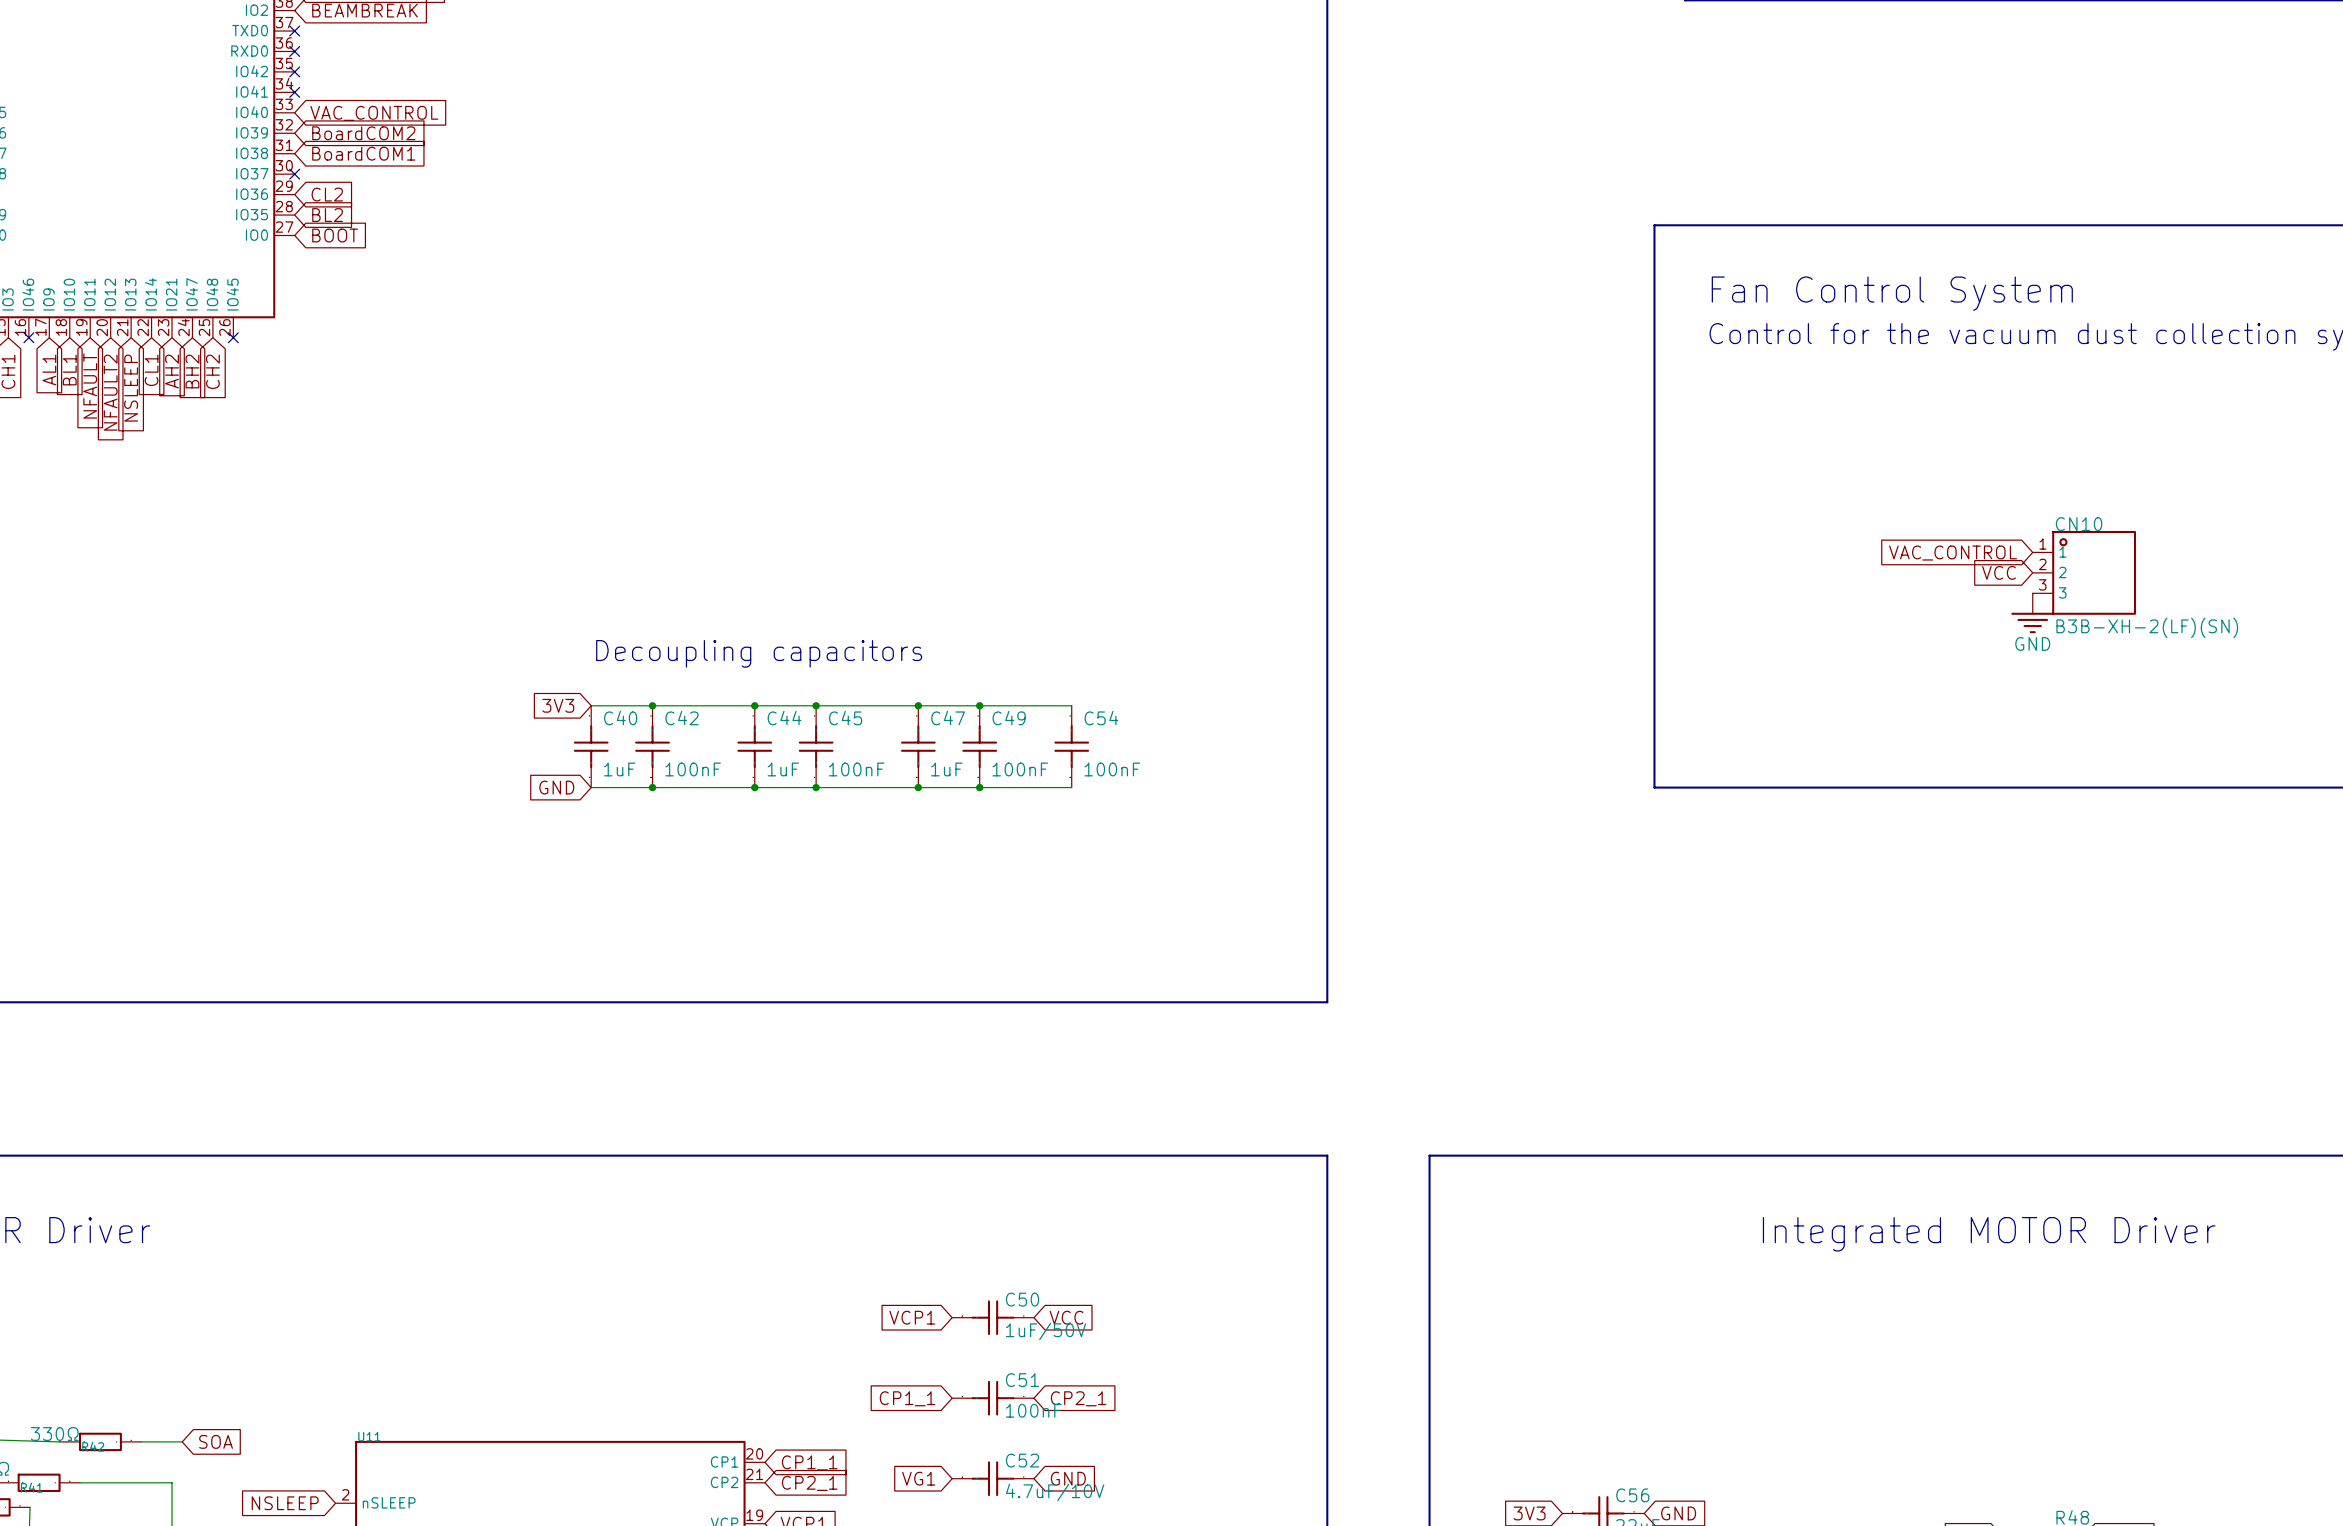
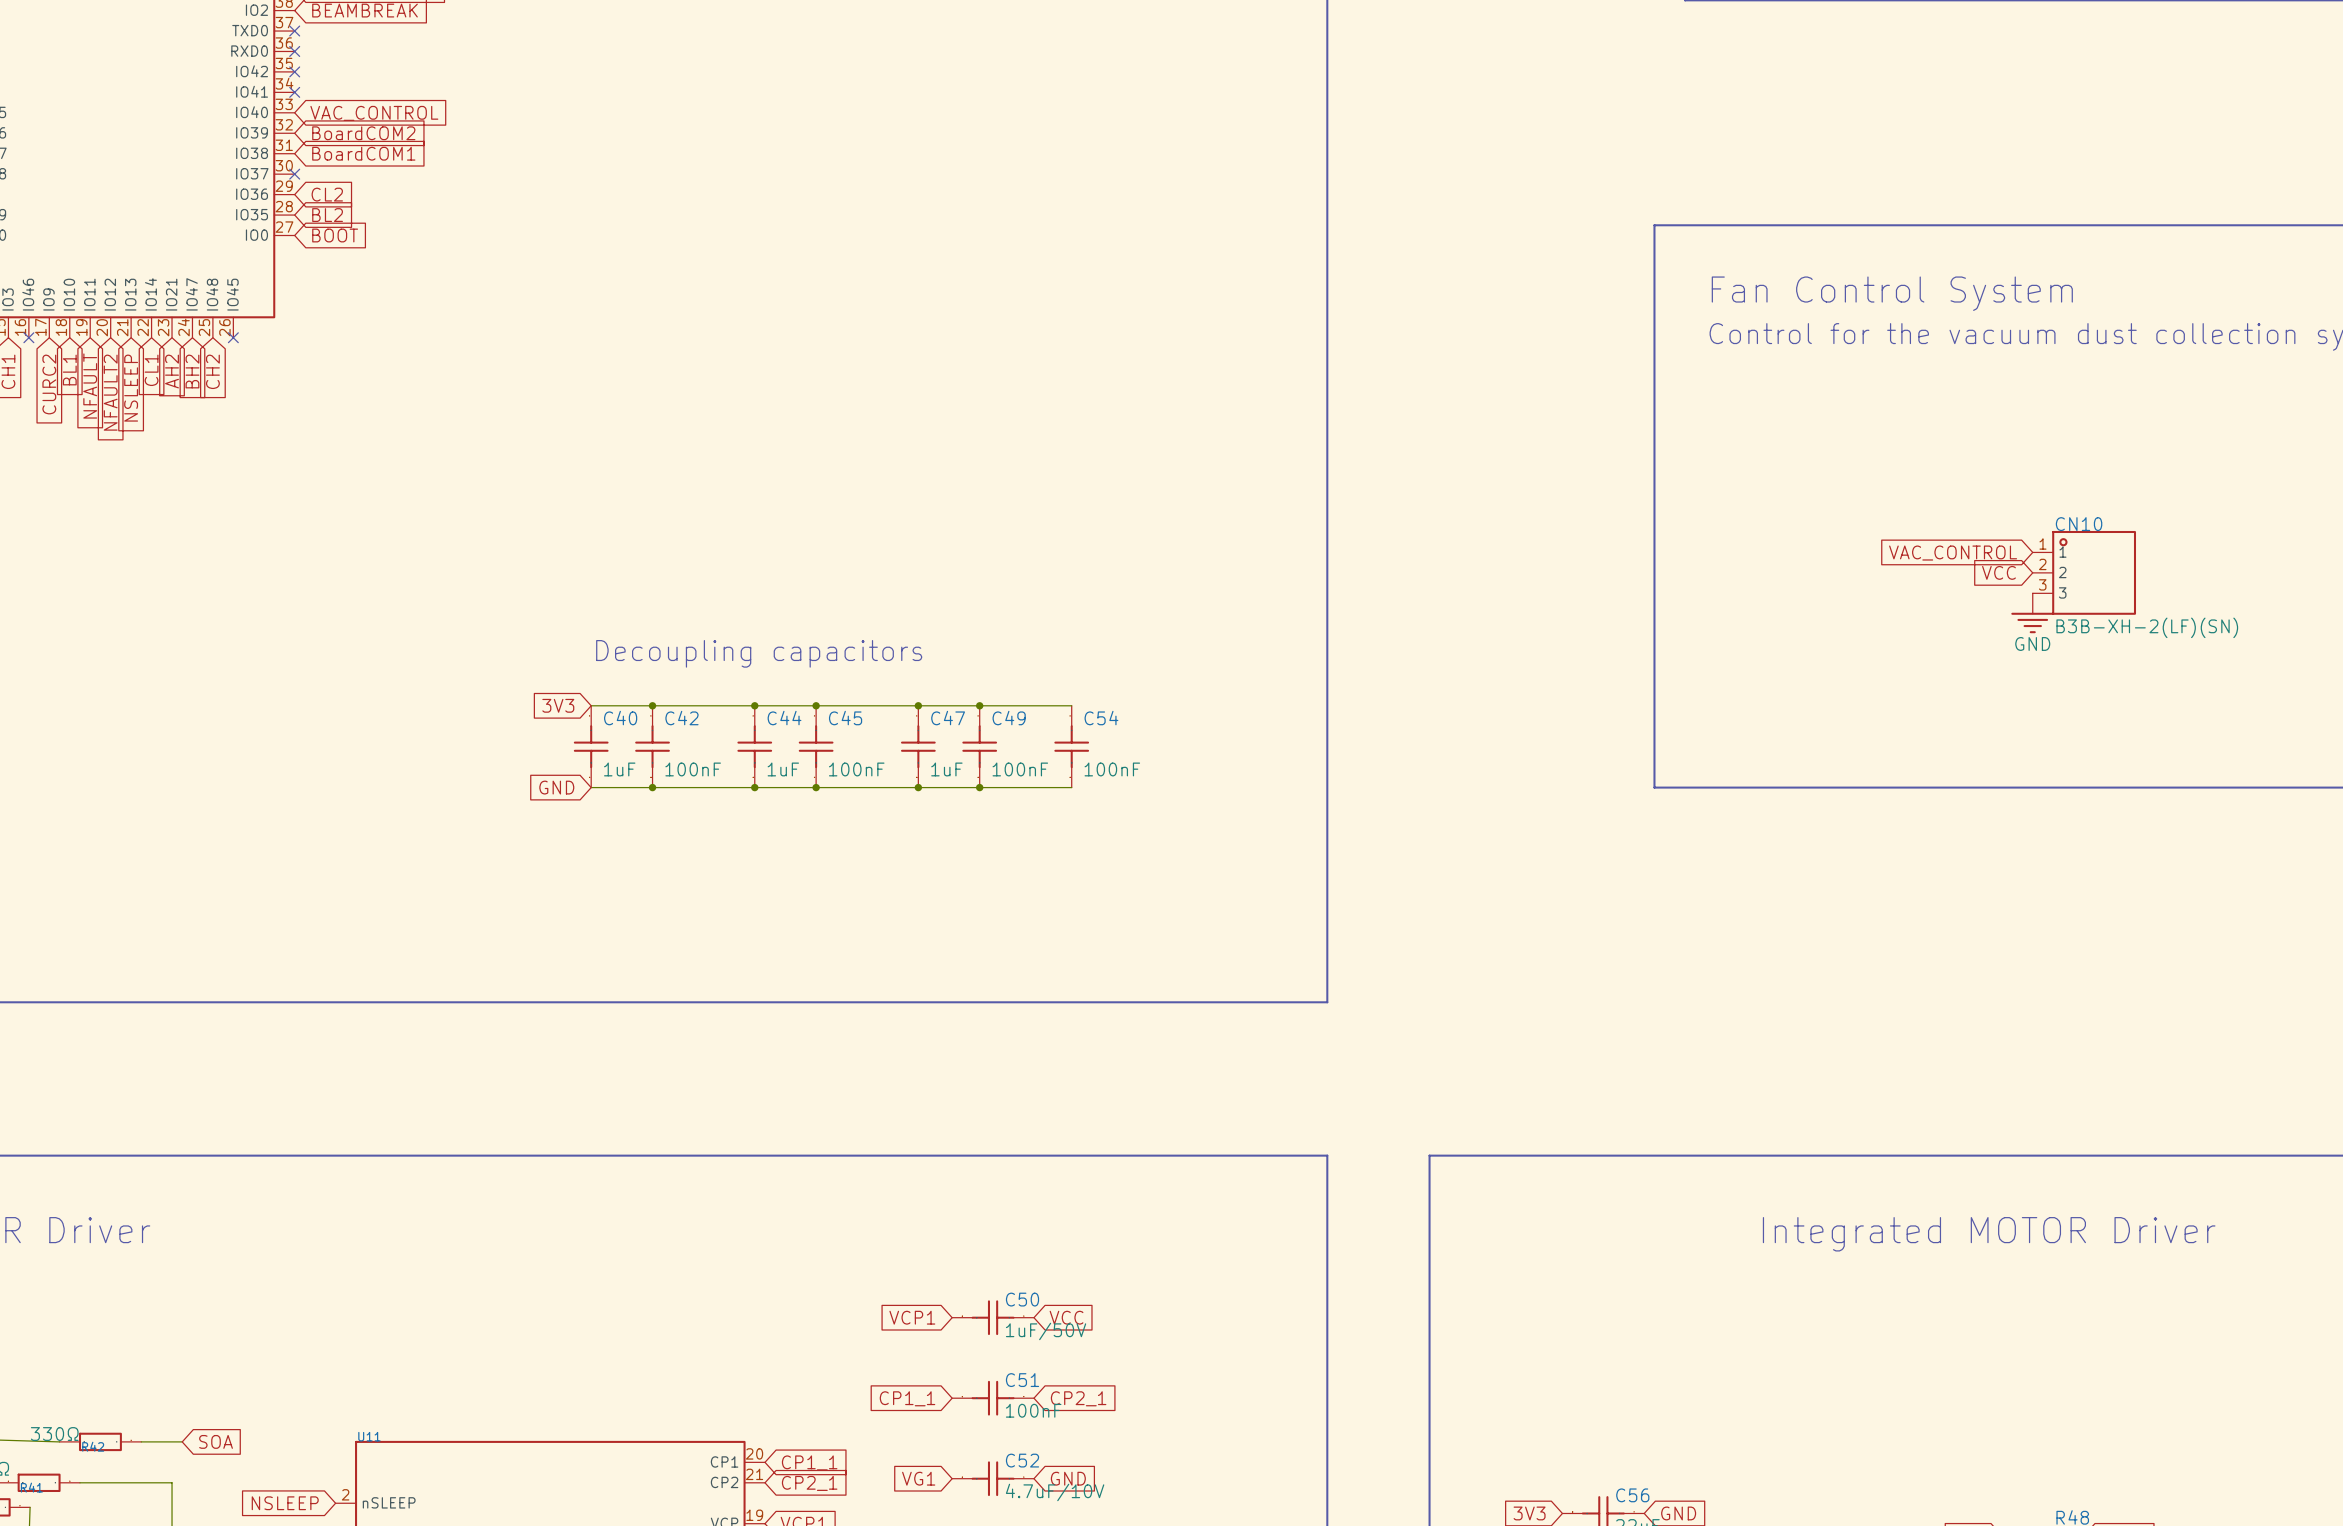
global label: AL1 (49, 370) -> CURC2 (49, 384)

